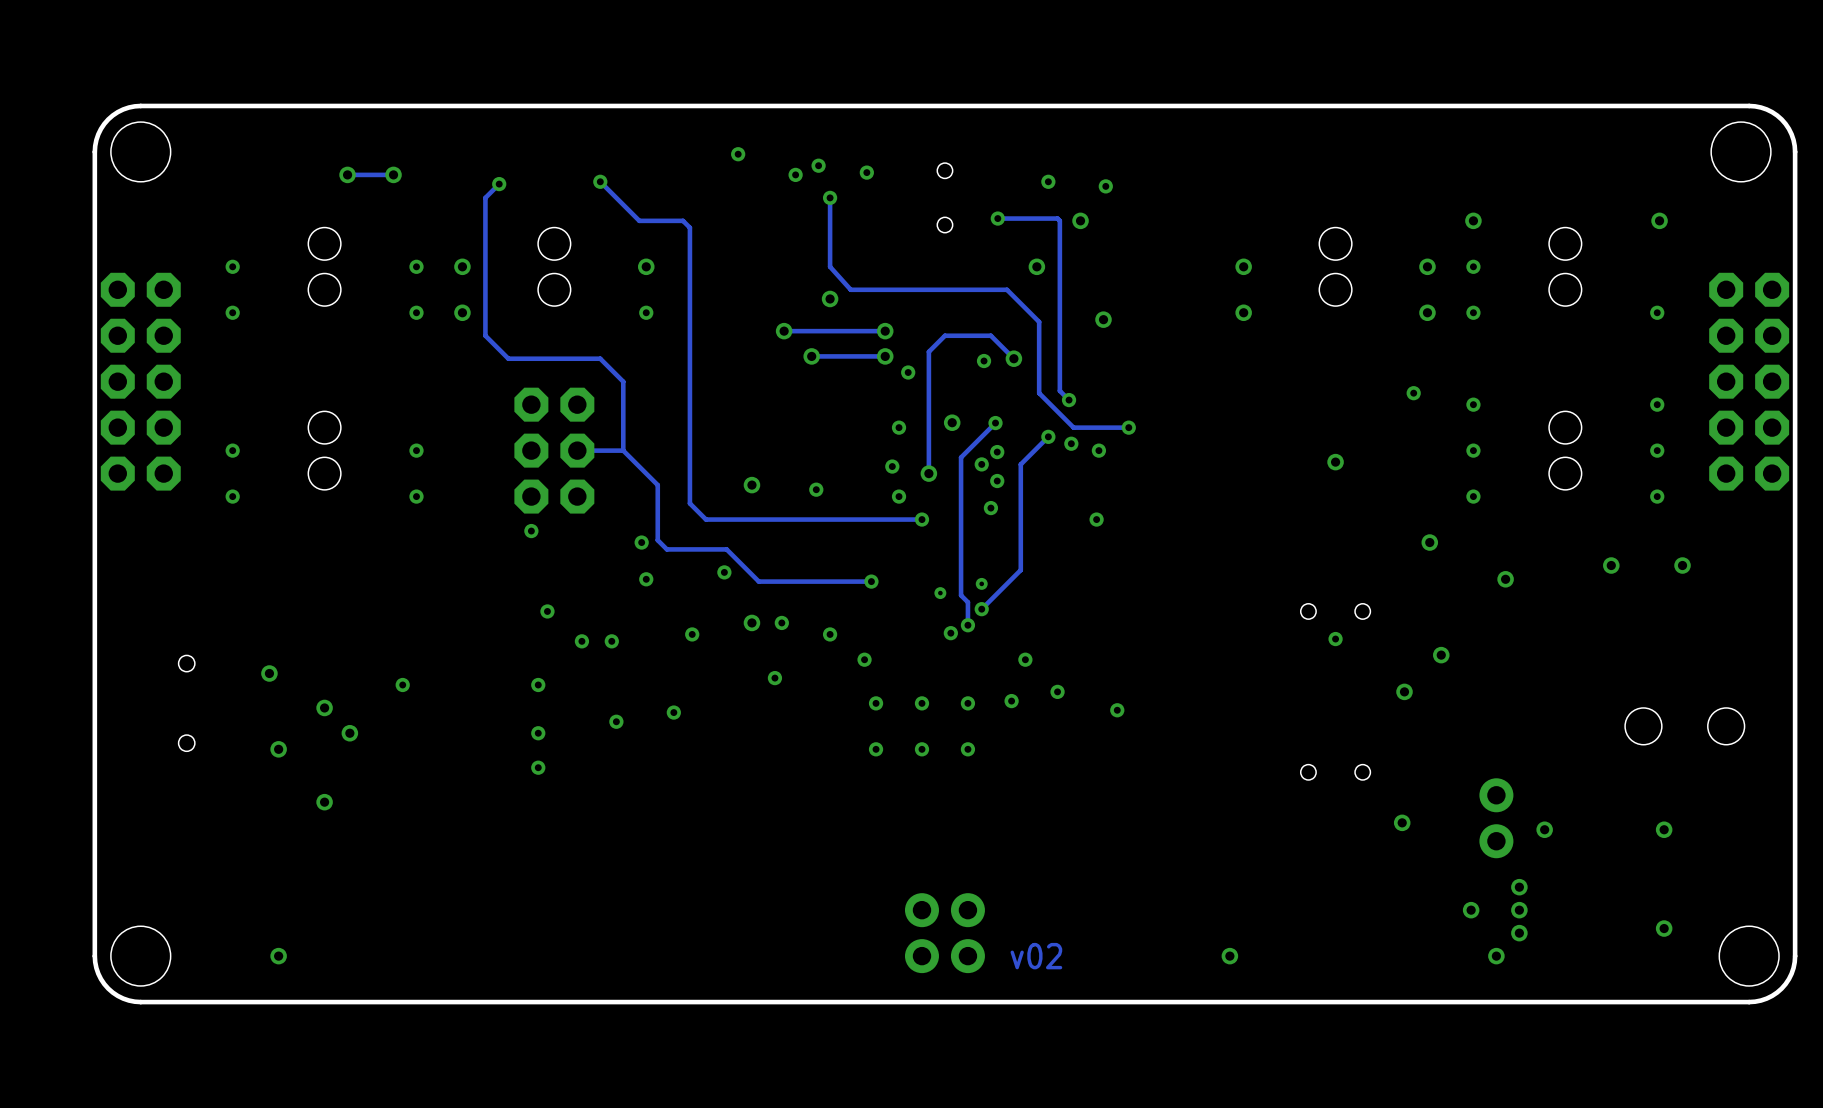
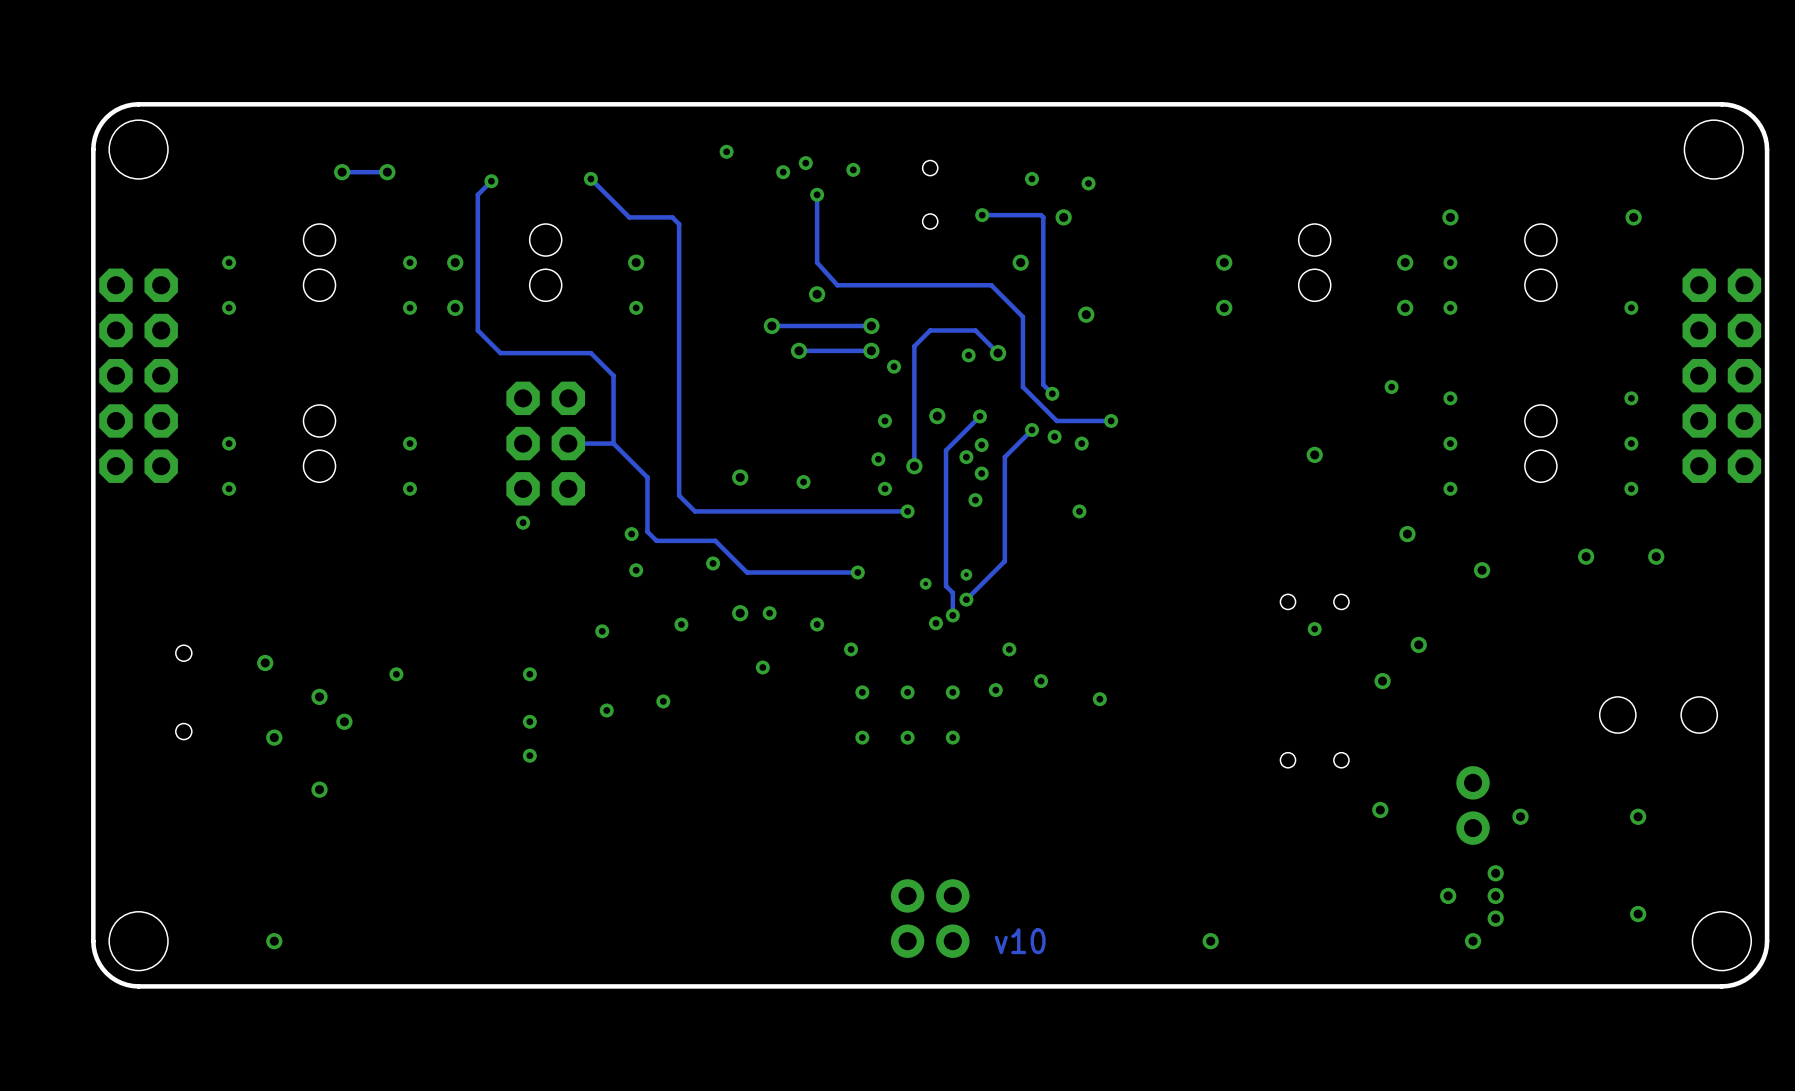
via: (547, 611) -> none
via: (581, 641) -> none
text: v02 (1036, 956) -> v10 (1020, 941)

